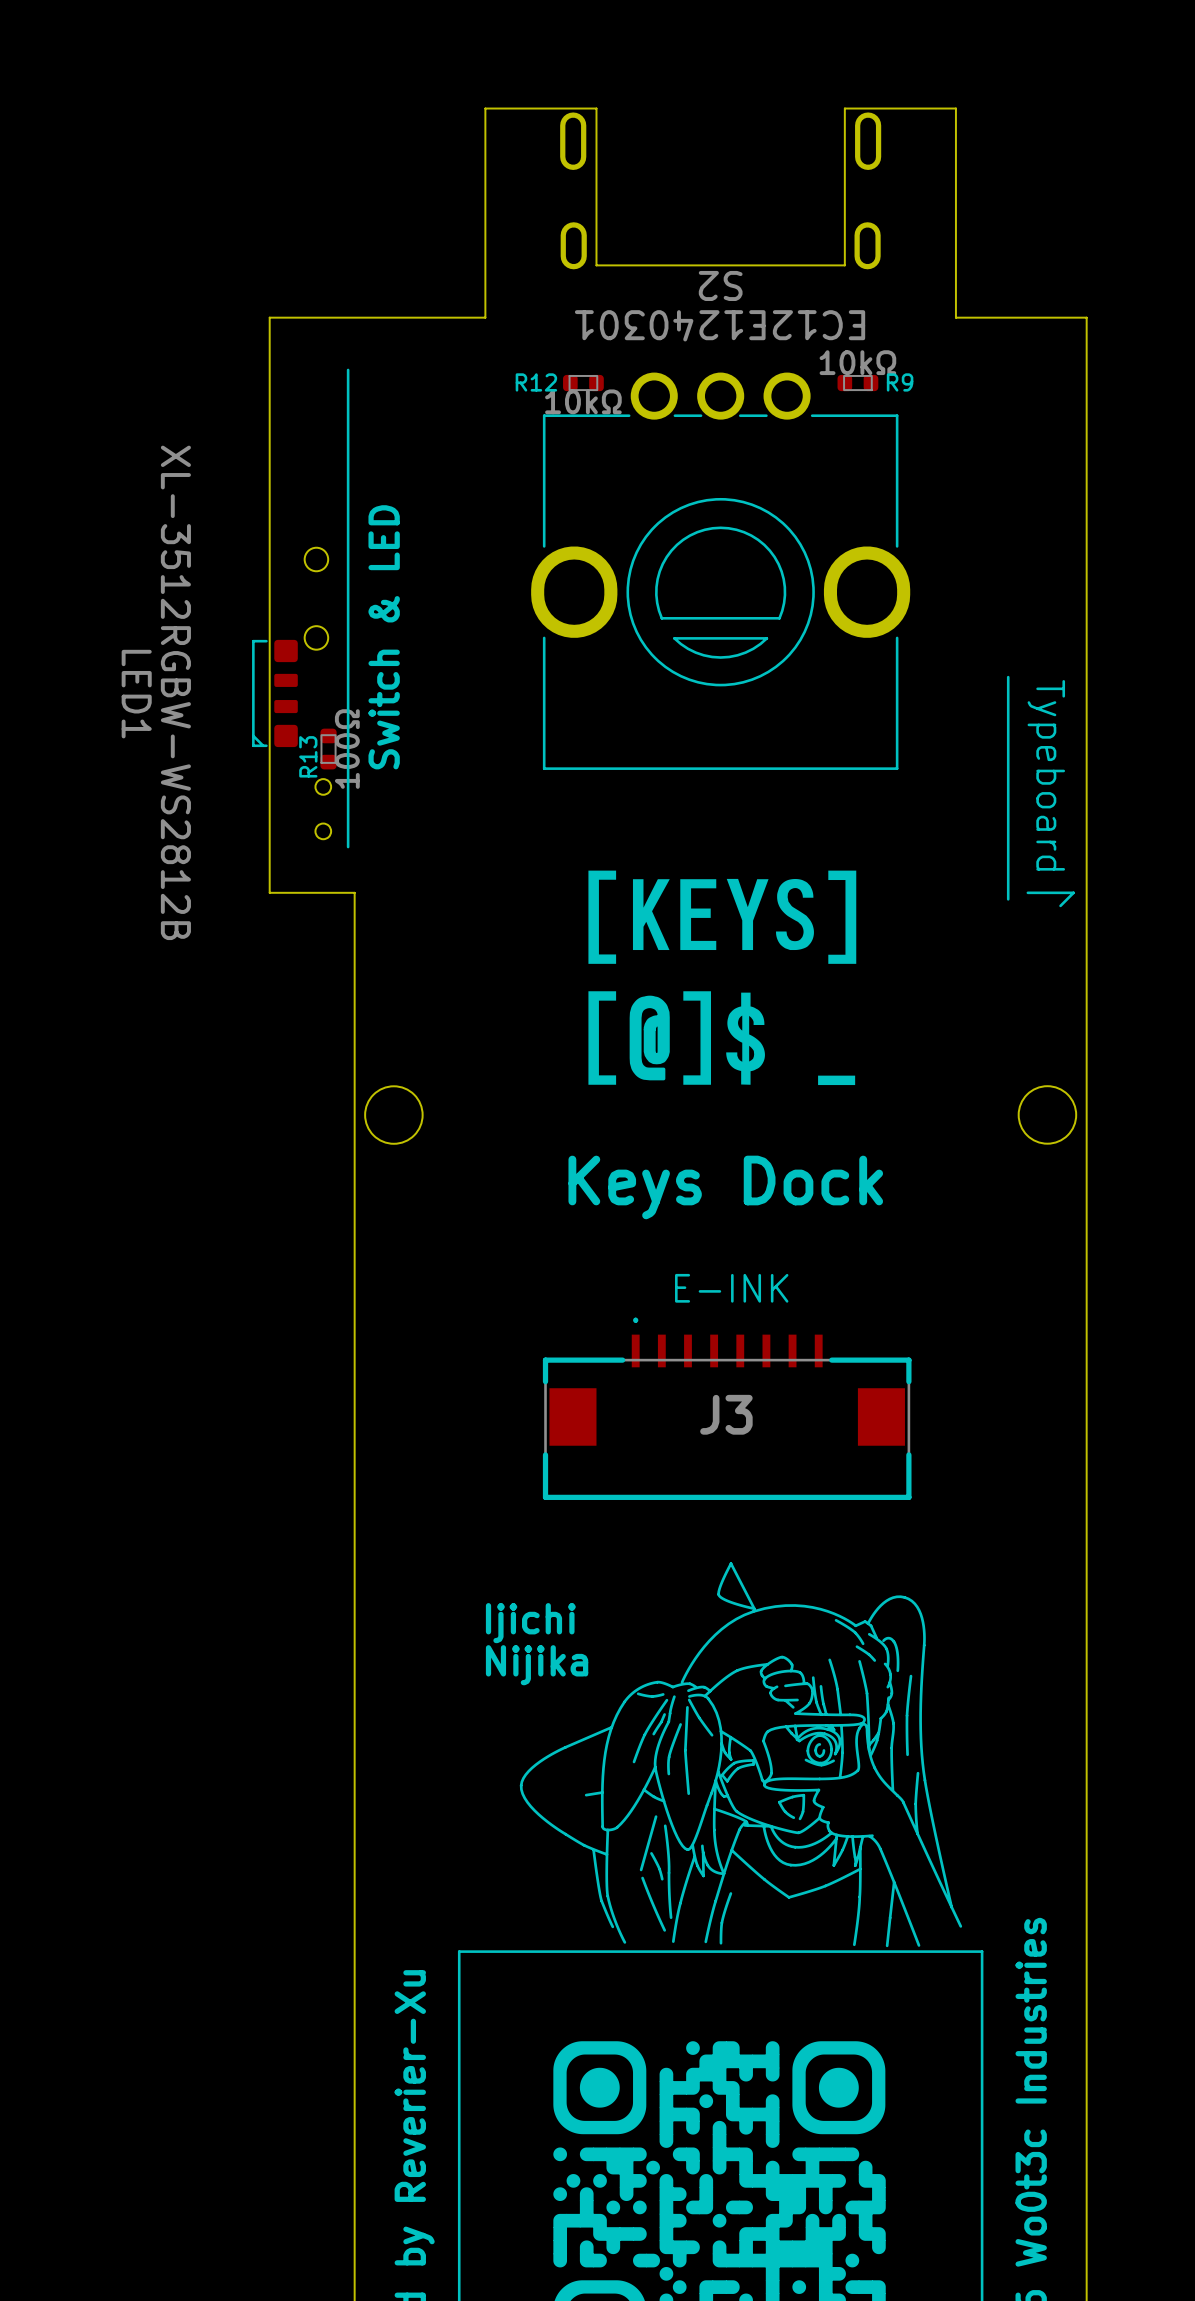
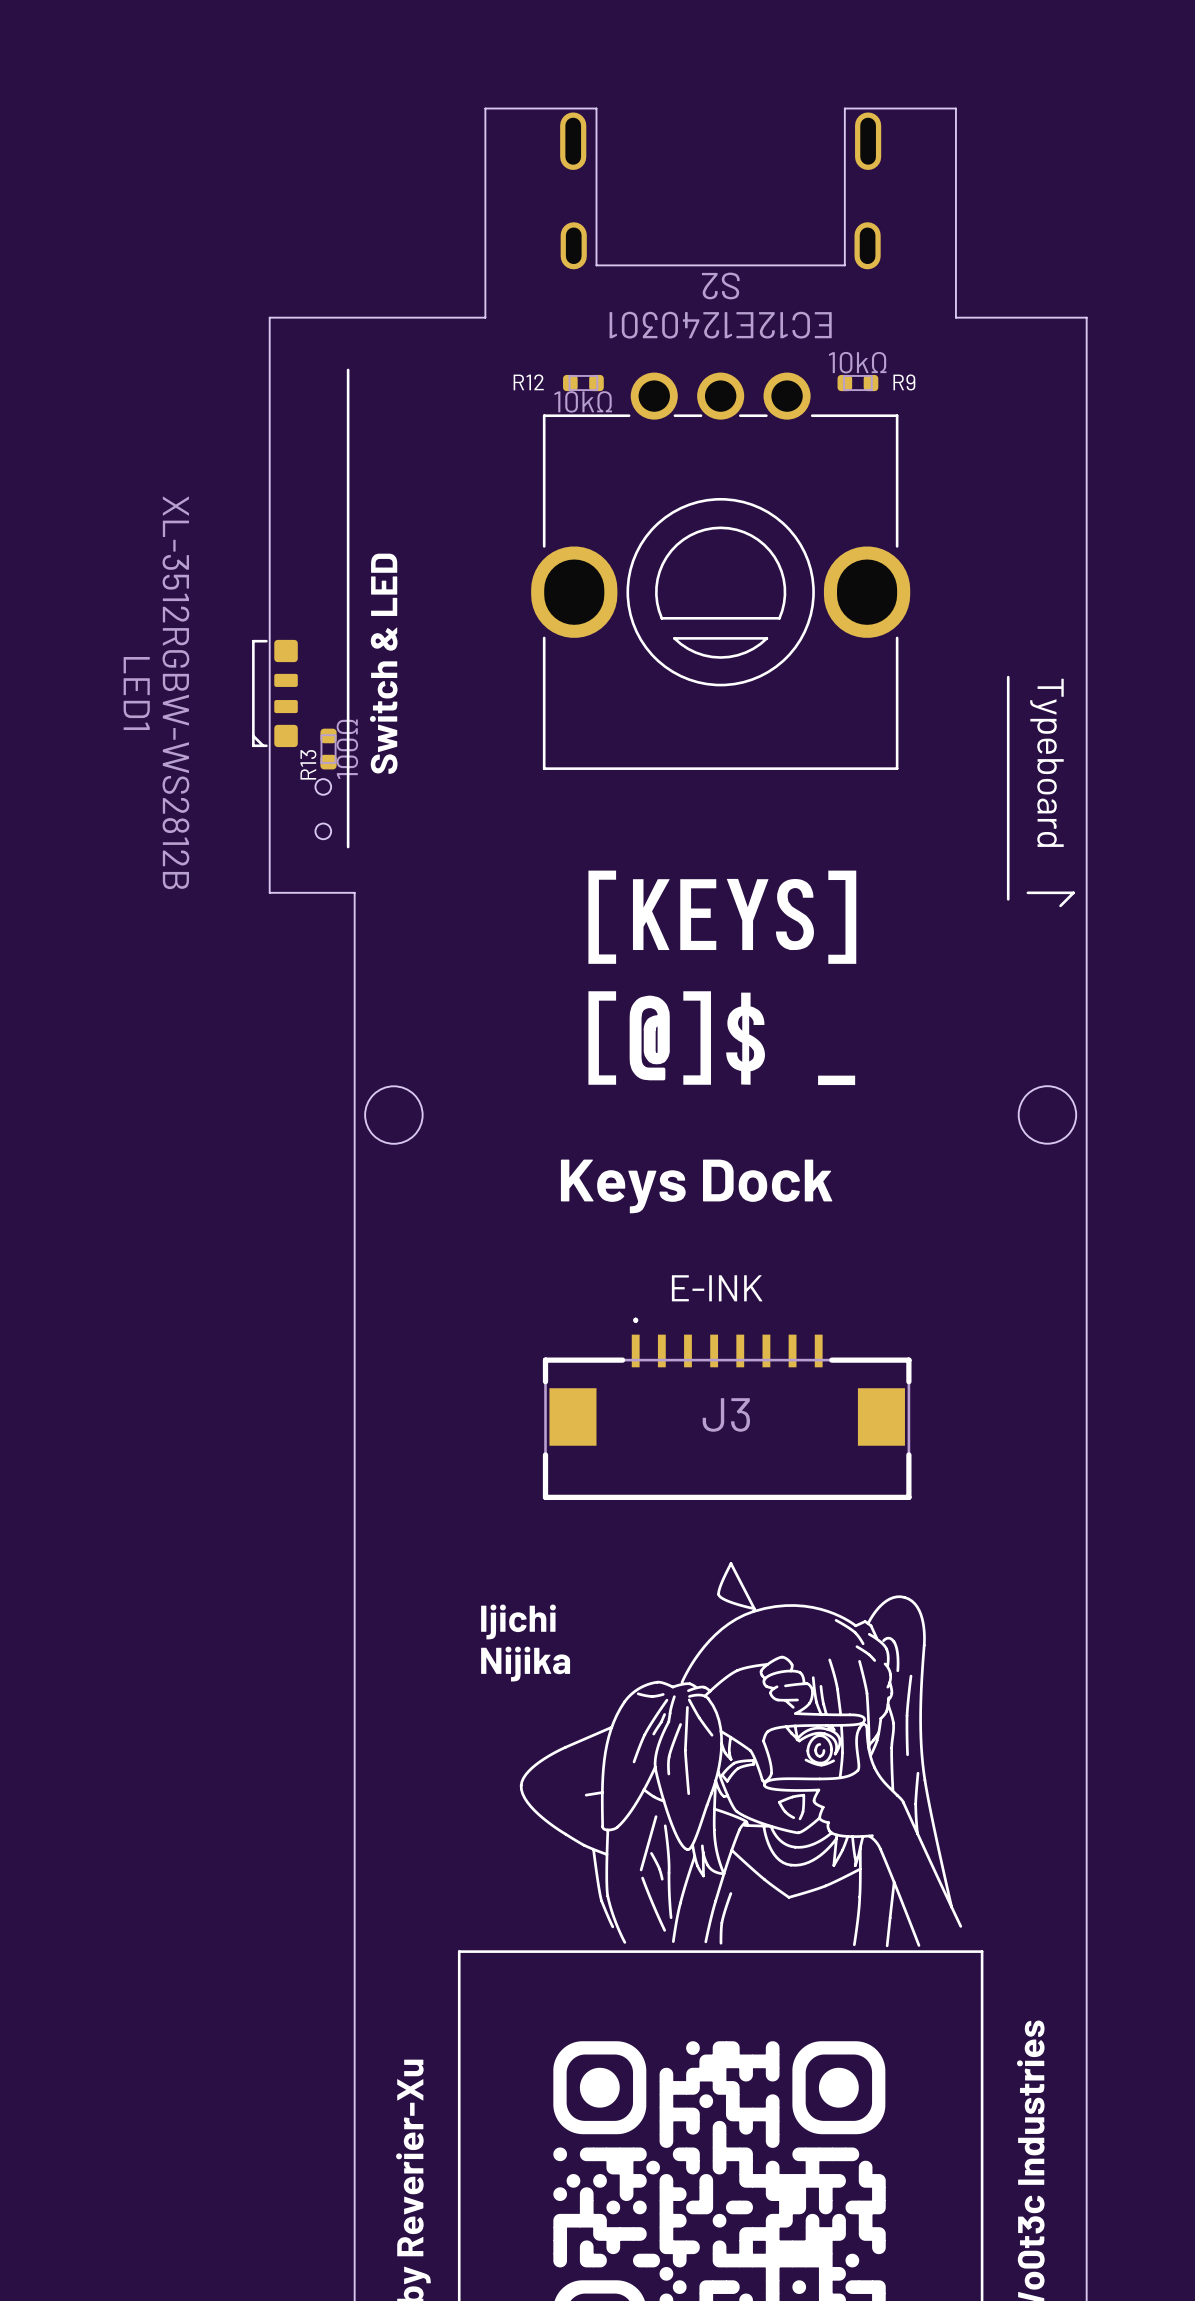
part: (316, 598) -> none

